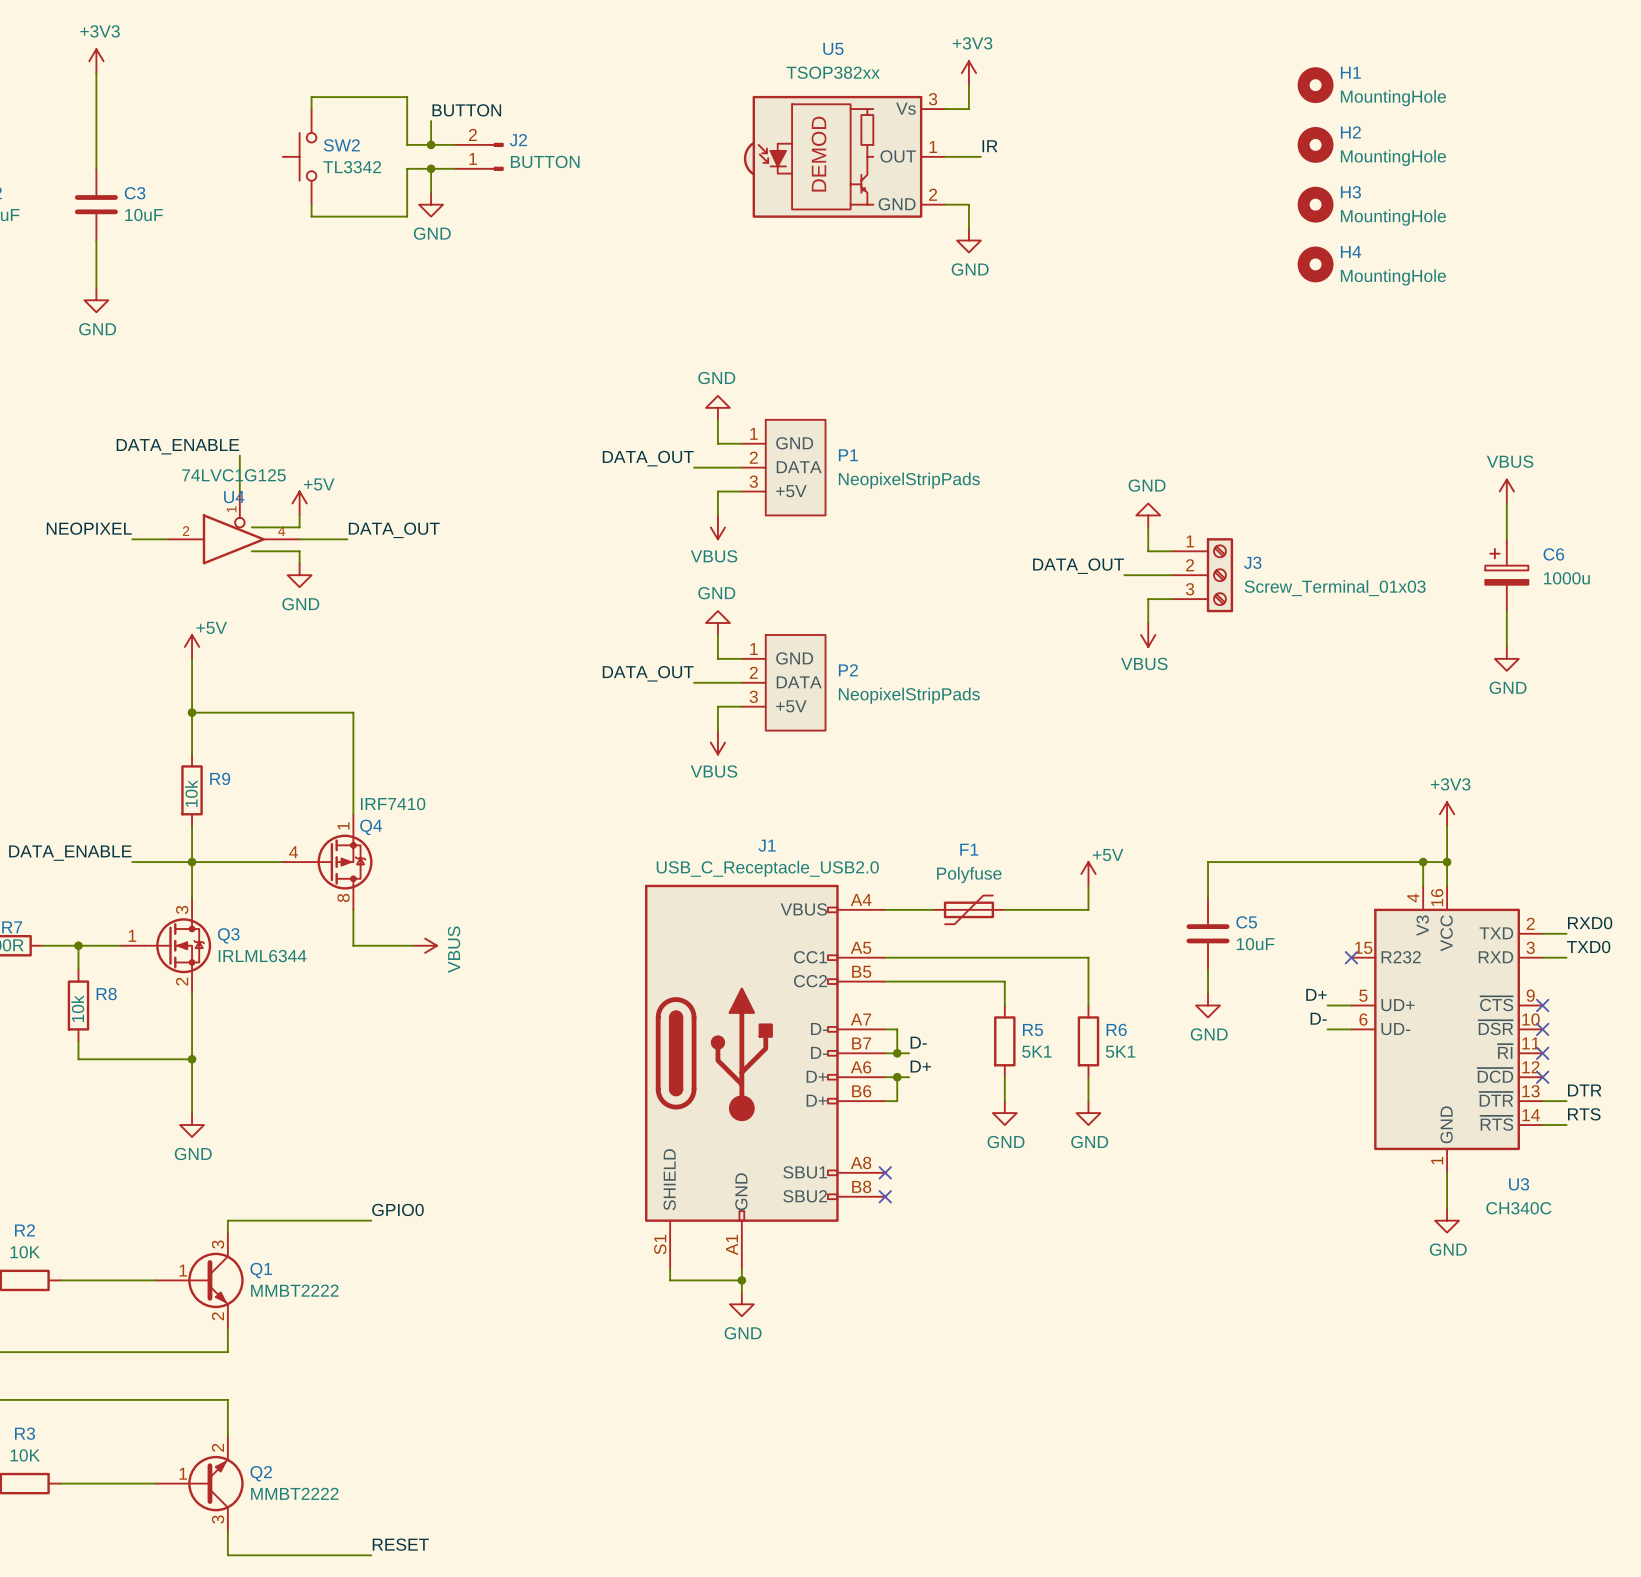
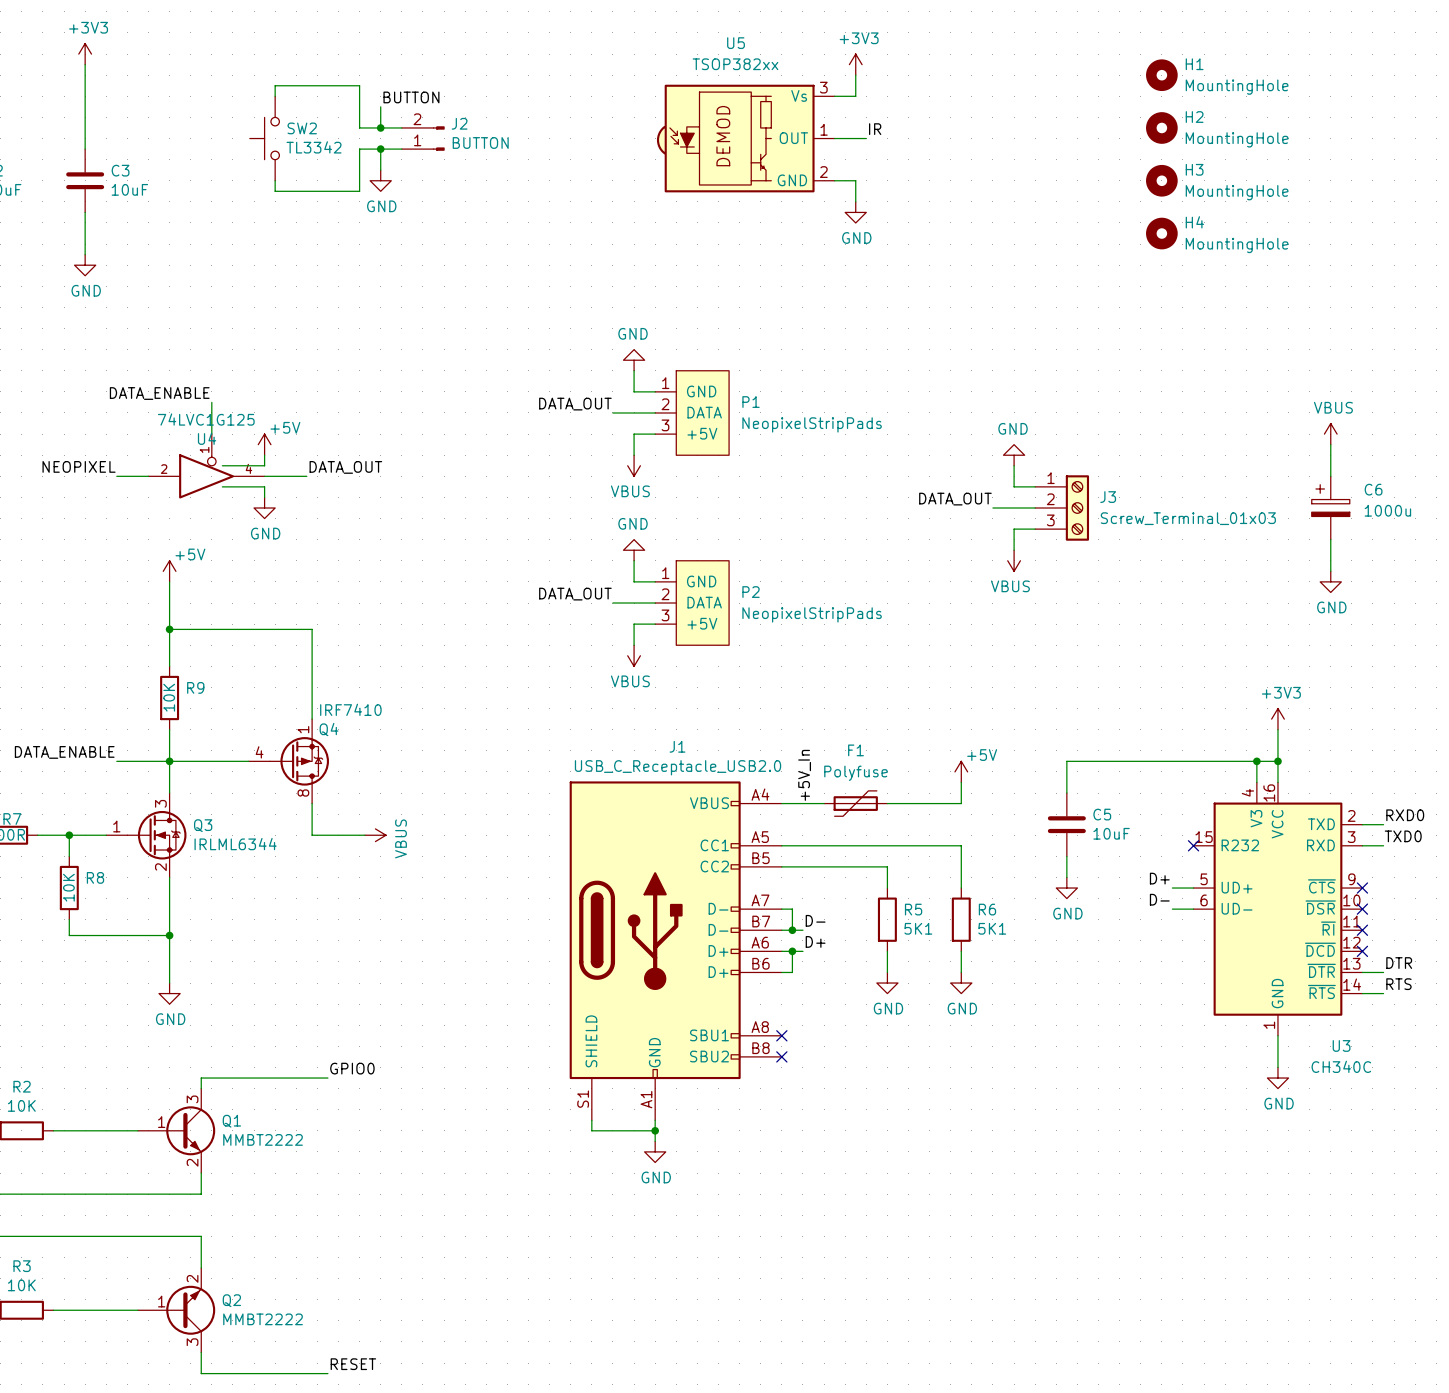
R9 value: 10k (191, 793) -> 10K (169, 697)
label: none -> +5V_In (804, 775)
R8 value: 10k (77, 1008) -> 10K (68, 887)

